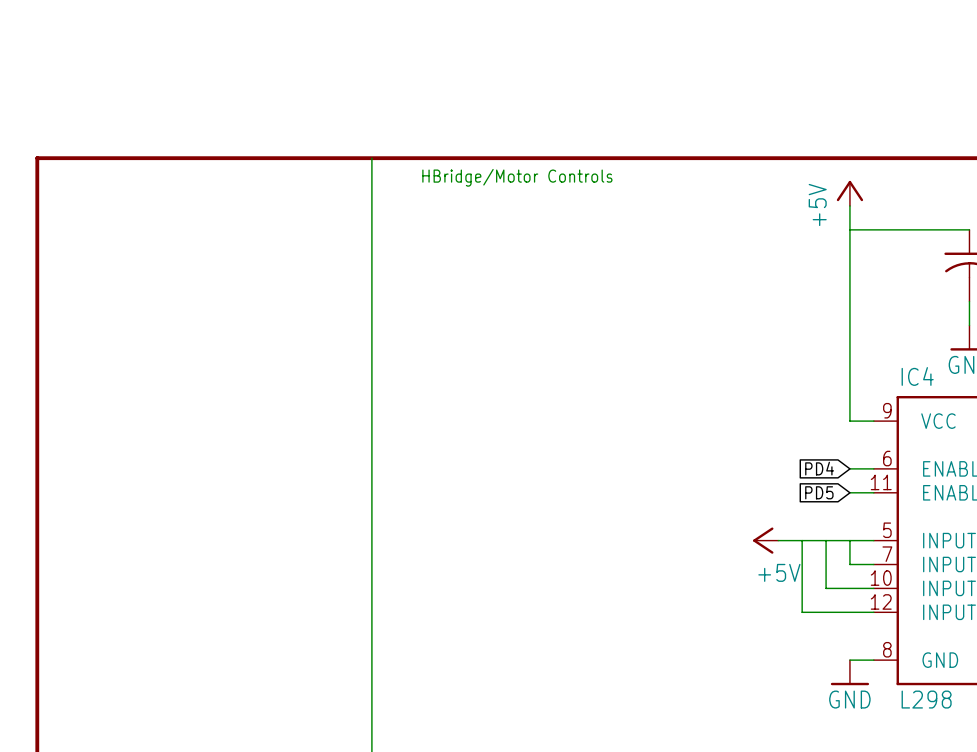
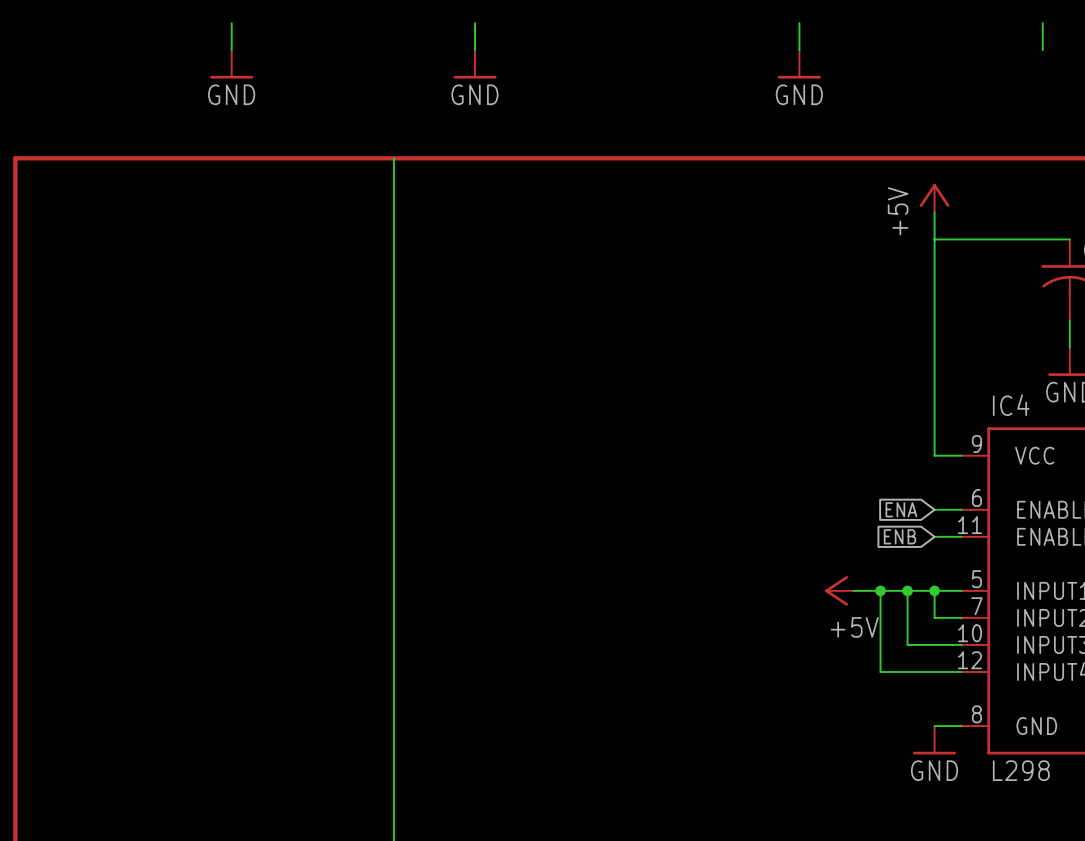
wire: none -> (231, 23) (231, 50)
wire: none -> (475, 23) (475, 50)
wire: none -> (799, 23) (799, 50)
wire: none -> (1042, 23) (1042, 50)
power symbol: none -> GND (231, 64)
power symbol: none -> GND (475, 64)
power symbol: none -> GND (799, 64)
text: HBridge/Motor Controls (517, 177) -> none
global label: PD4 (819, 468) -> ENA (901, 509)
global label: PD5 (819, 492) -> ENB (900, 536)
junction: none -> (880, 590)
junction: none -> (907, 590)
junction: none -> (934, 590)

